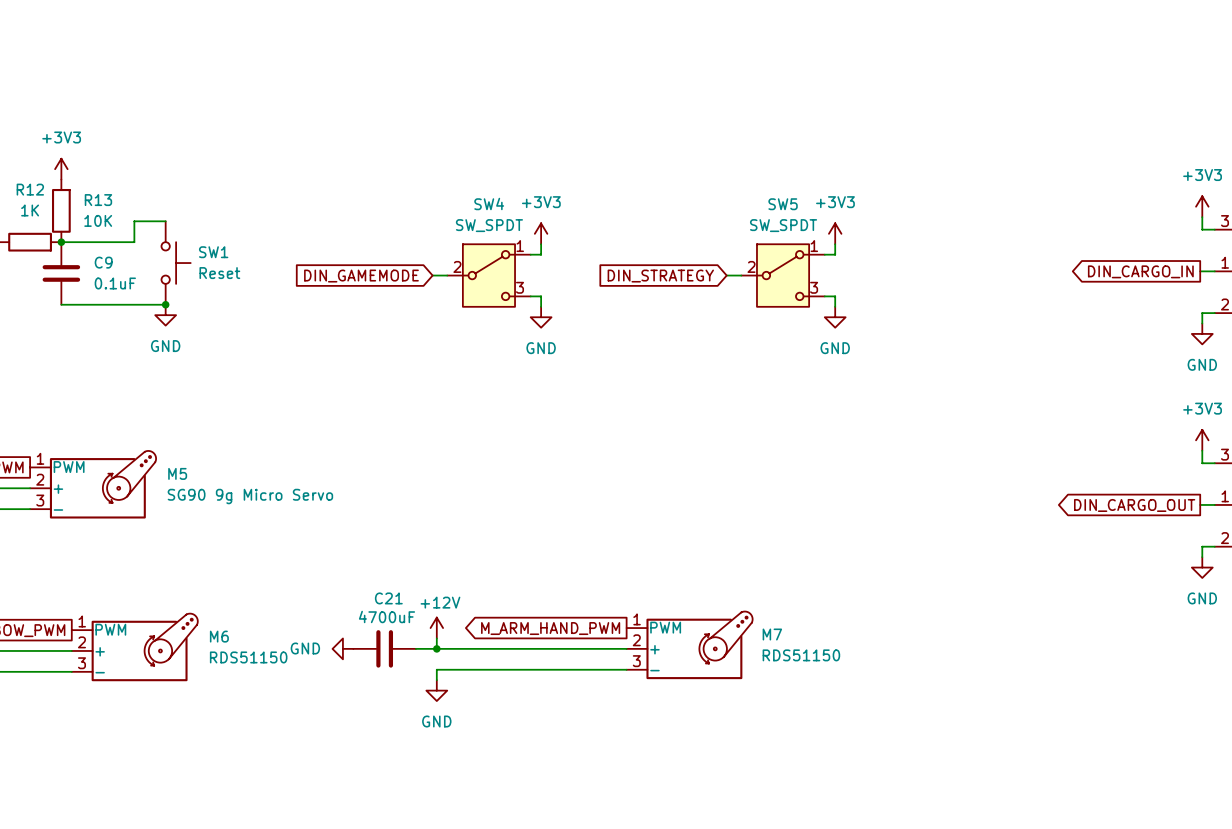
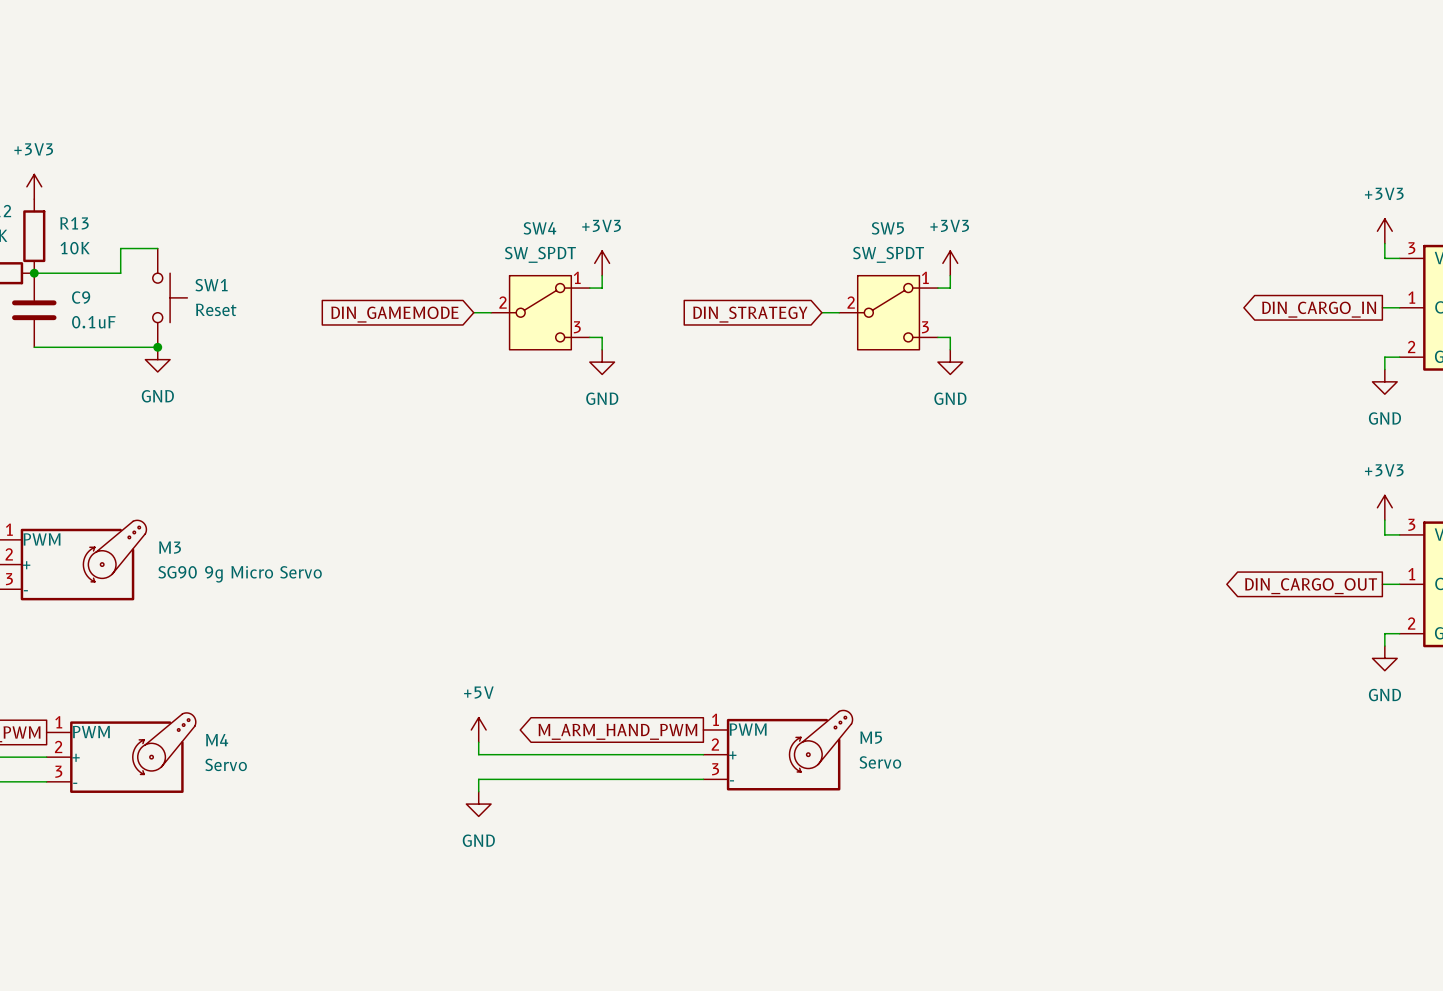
M5 name: M5 (177, 473) -> M3 (170, 547)
power symbol: +12V (436, 628) -> +5V (478, 729)
M7 name: M7 (772, 634) -> M5 (871, 737)
M6 name: M6 (219, 636) -> M4 (217, 740)
power symbol: GND (342, 648) -> none
C21: 4700uF (384, 648) -> none
wire: (415, 648) (436, 648) -> none
junction: (436, 648) -> none
M7 value: RDS51150 (801, 655) -> Servo (880, 762)
M6 value: RDS51150 (248, 657) -> Servo (226, 764)

